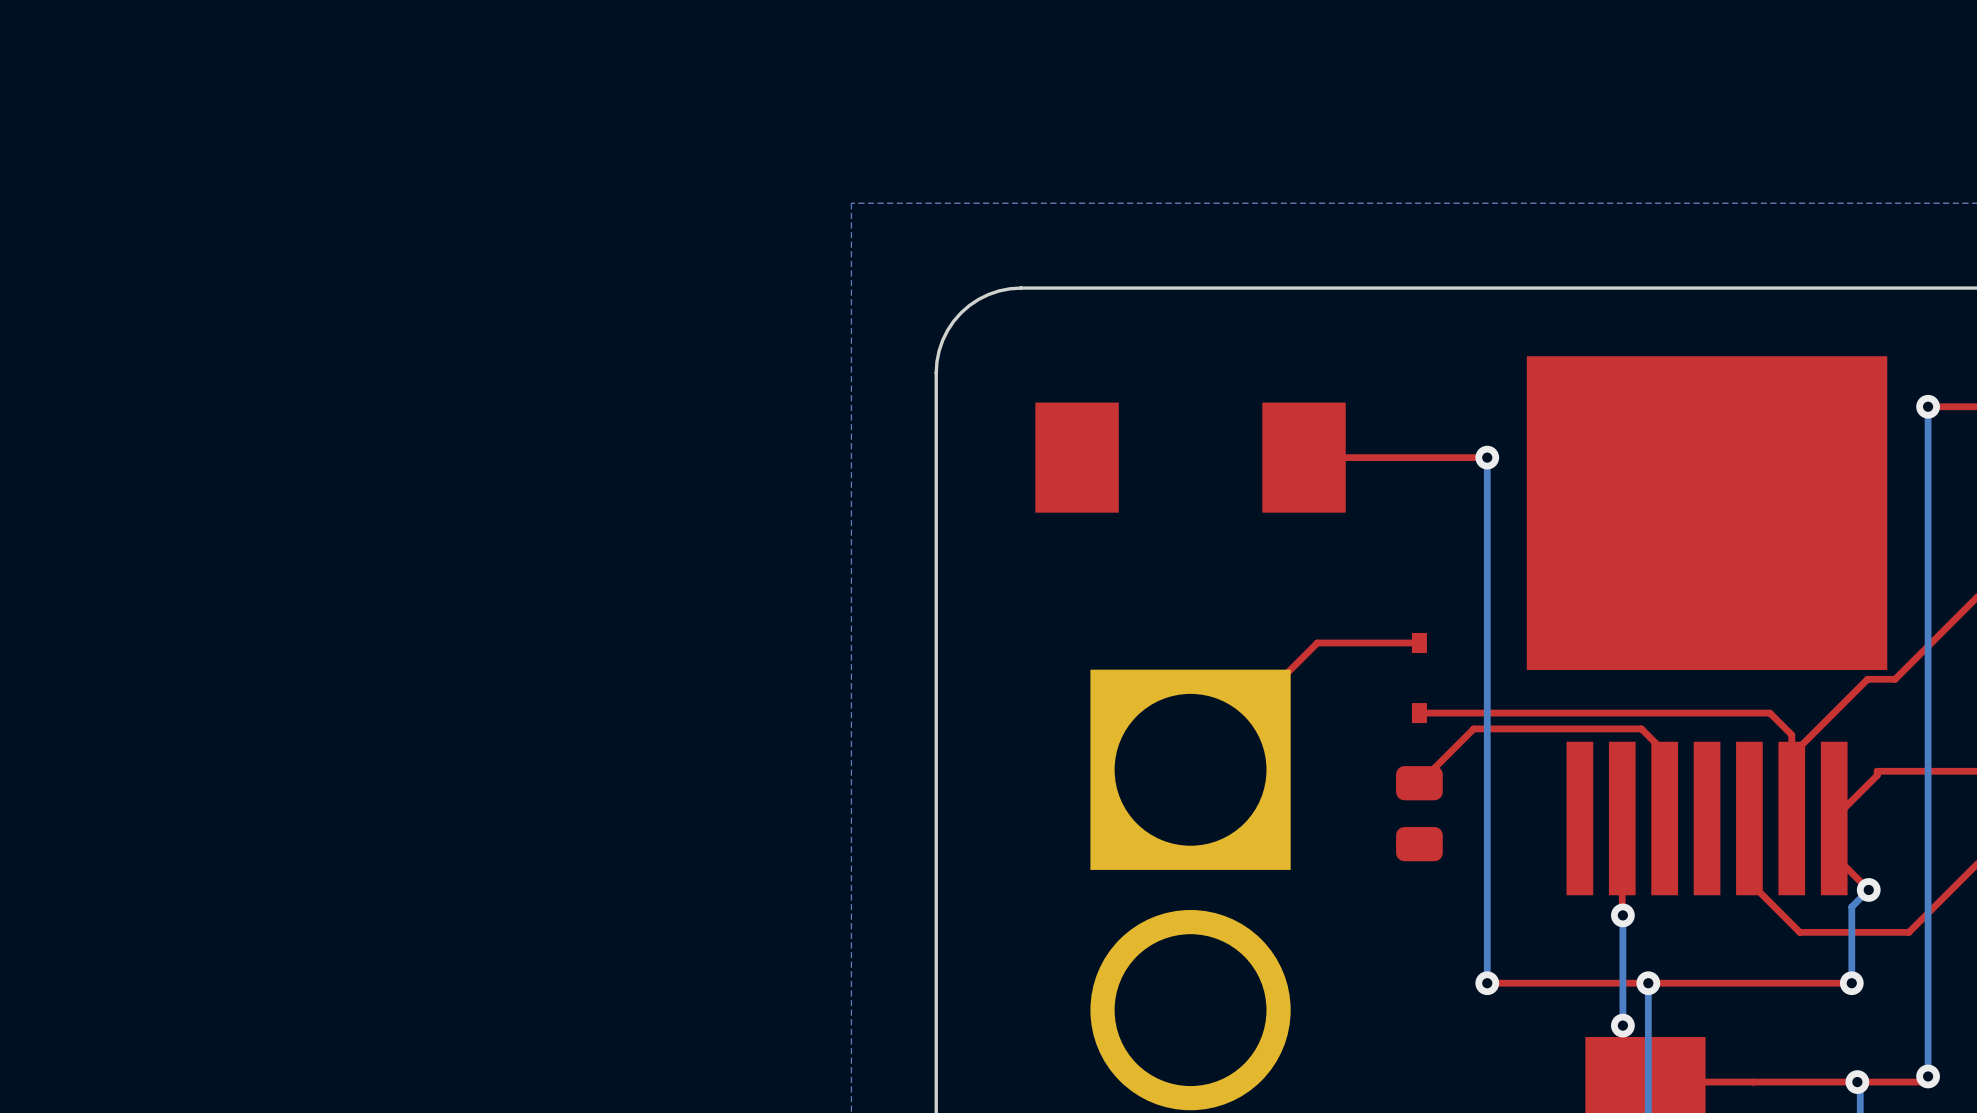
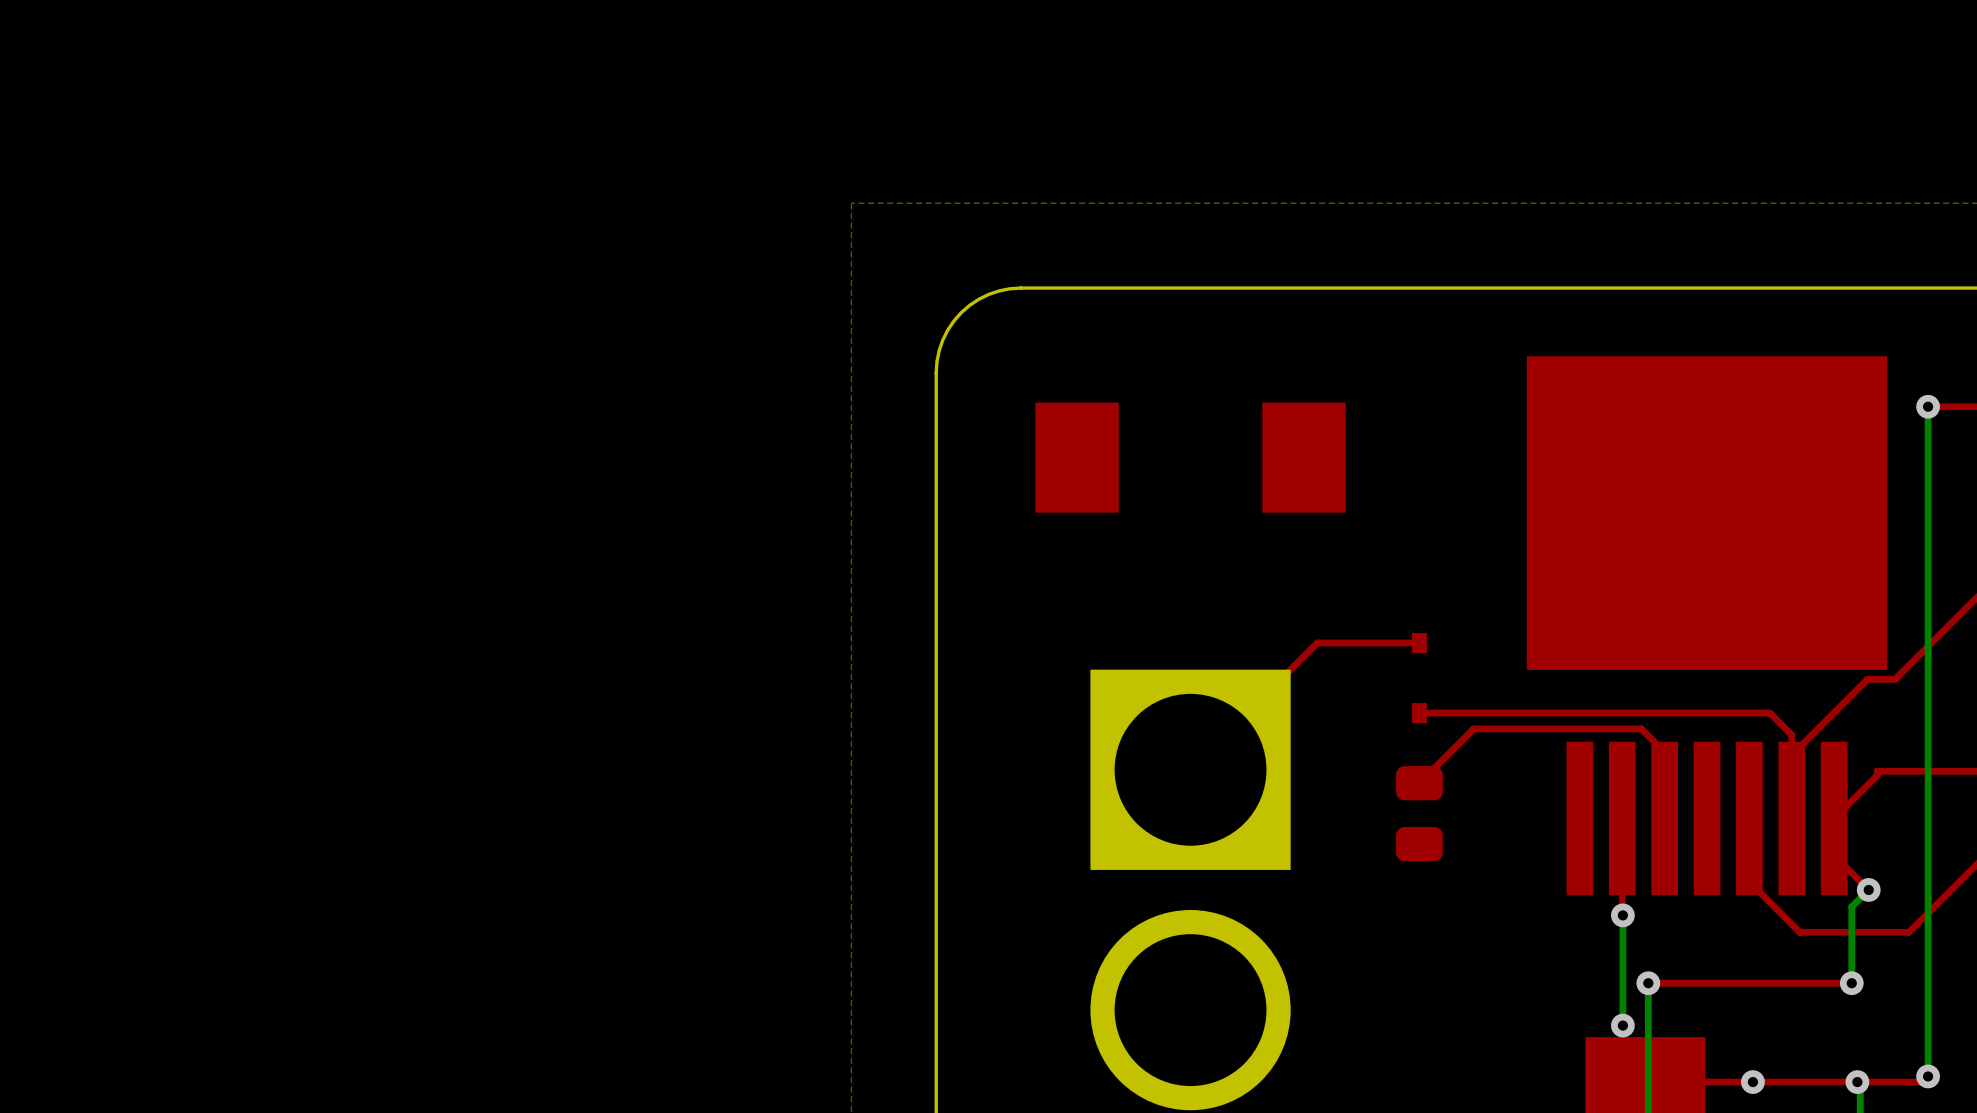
top track: (1487, 457) (1304, 457) -> none
bottom track: (1487, 457) (1487, 983) -> none
via: (1487, 457) -> none
via: (1487, 983) -> none
top track: (1648, 983) (1487, 983) -> none
via: none -> (1752, 1082)

